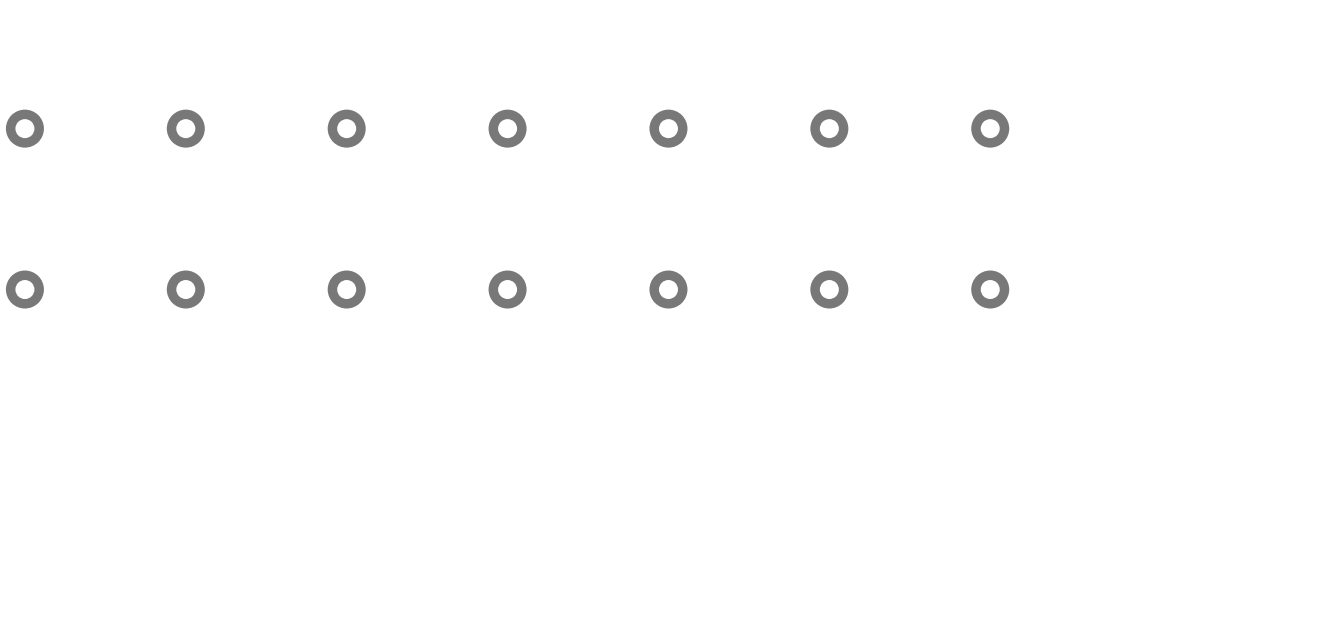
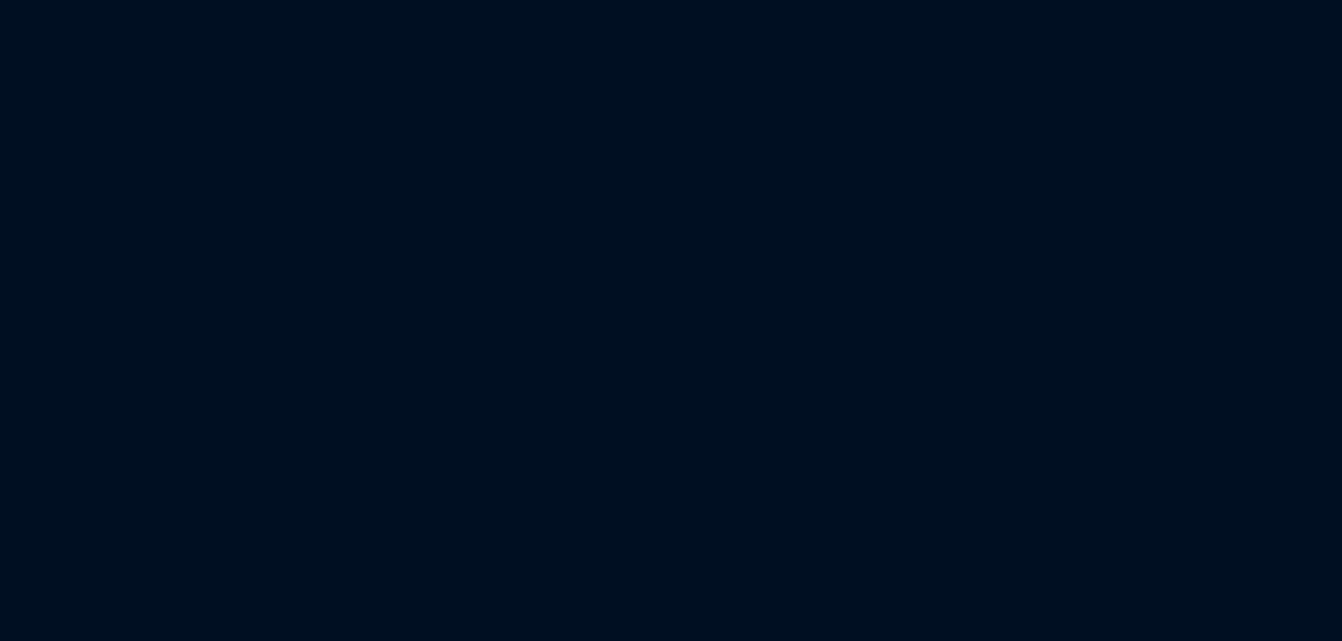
via: (24, 128) -> none
via: (185, 128) -> none
via: (346, 128) -> none
via: (507, 128) -> none
via: (668, 128) -> none
via: (829, 128) -> none
via: (990, 128) -> none
via: (24, 289) -> none
via: (185, 289) -> none
via: (346, 289) -> none
via: (507, 289) -> none
via: (668, 289) -> none
via: (829, 289) -> none
via: (990, 289) -> none

